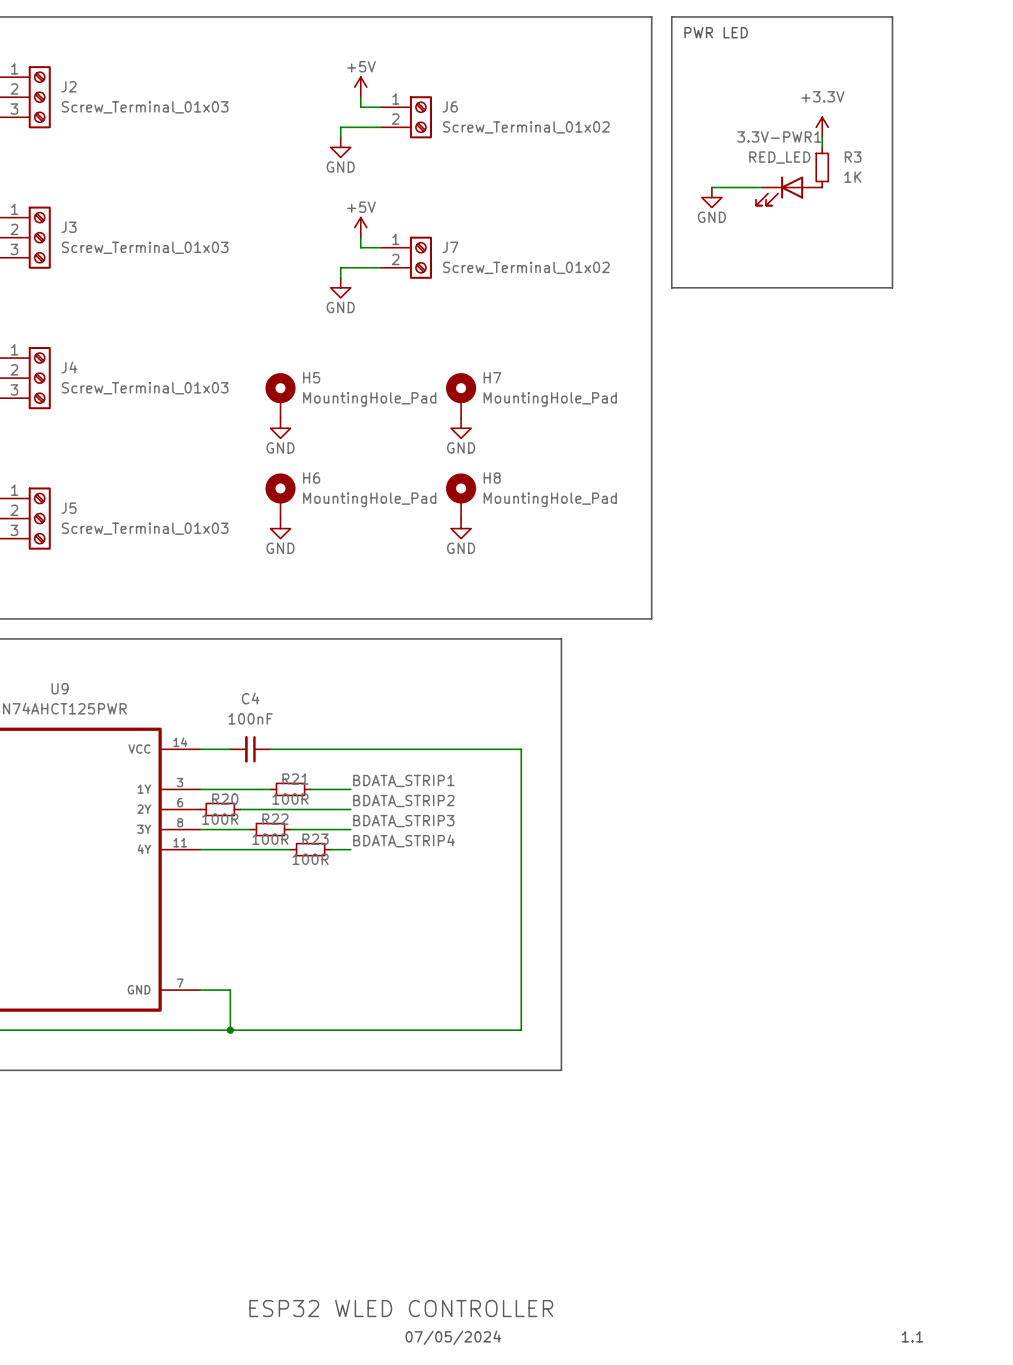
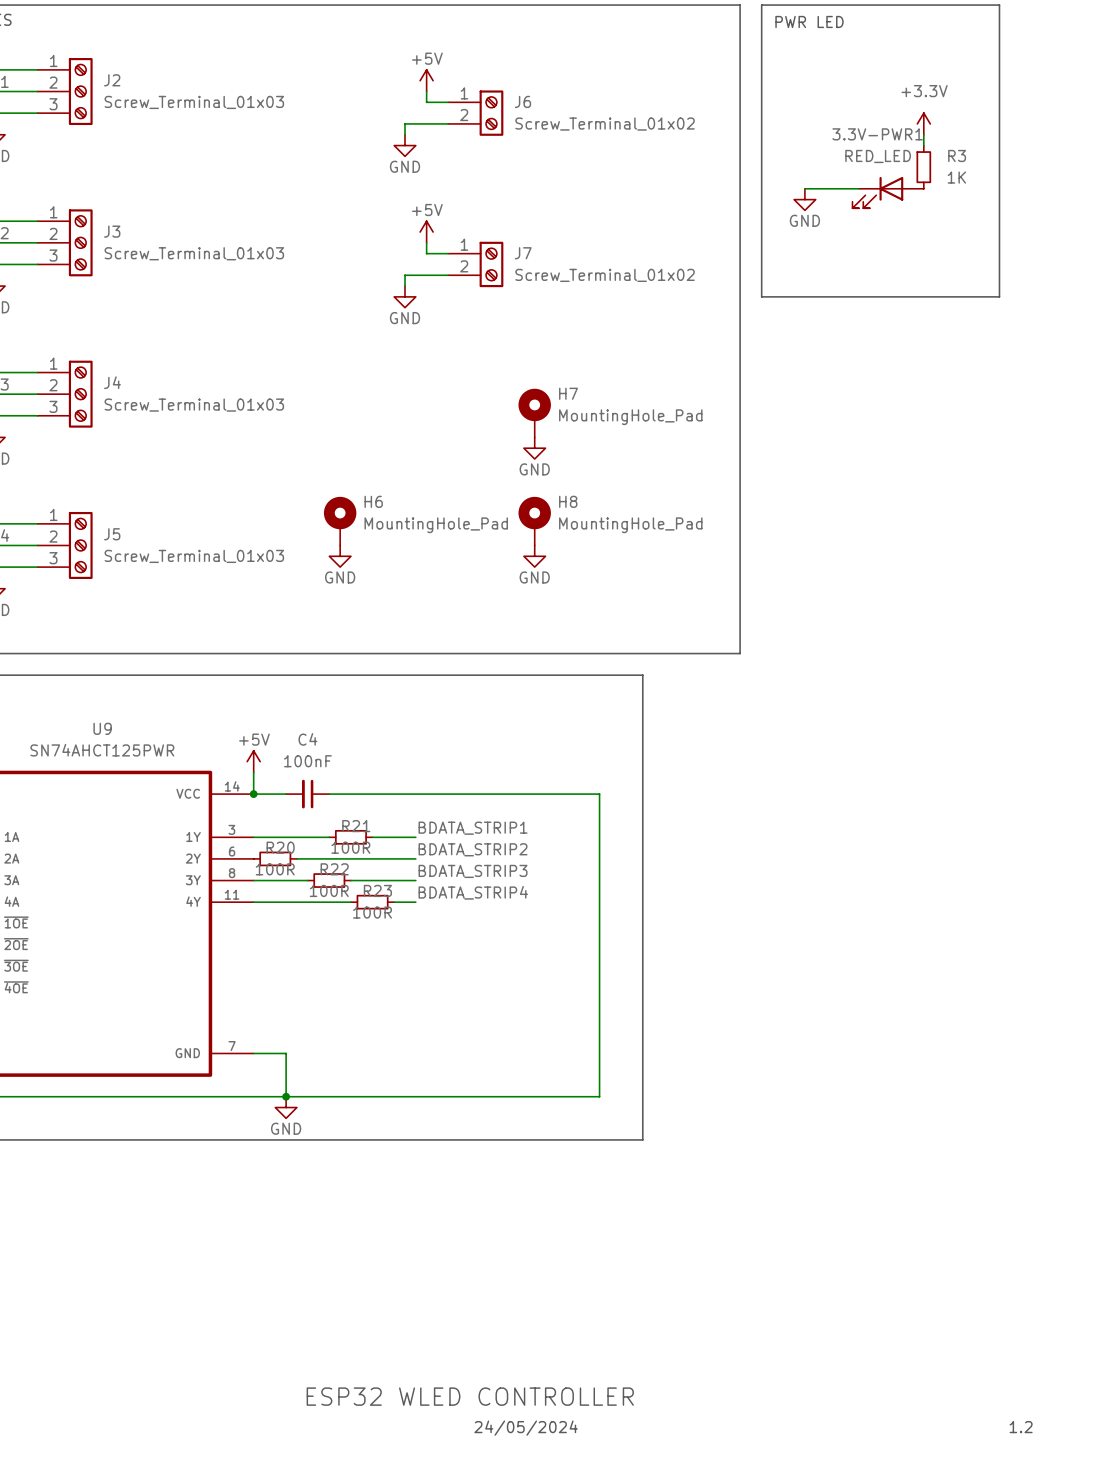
H5: MountingHole_Pad (280, 395) -> none
power symbol: GND (280, 428) -> none
power symbol: none -> +5V (253, 761)
wire: none -> (253, 772) (253, 794)
junction: none -> (253, 794)
power symbol: none -> GND (286, 1107)
text: 1.1 (912, 1336) -> 1.2 (1021, 1427)
text: 07/05/2024 (453, 1337) -> 24/05/2024 (526, 1428)

